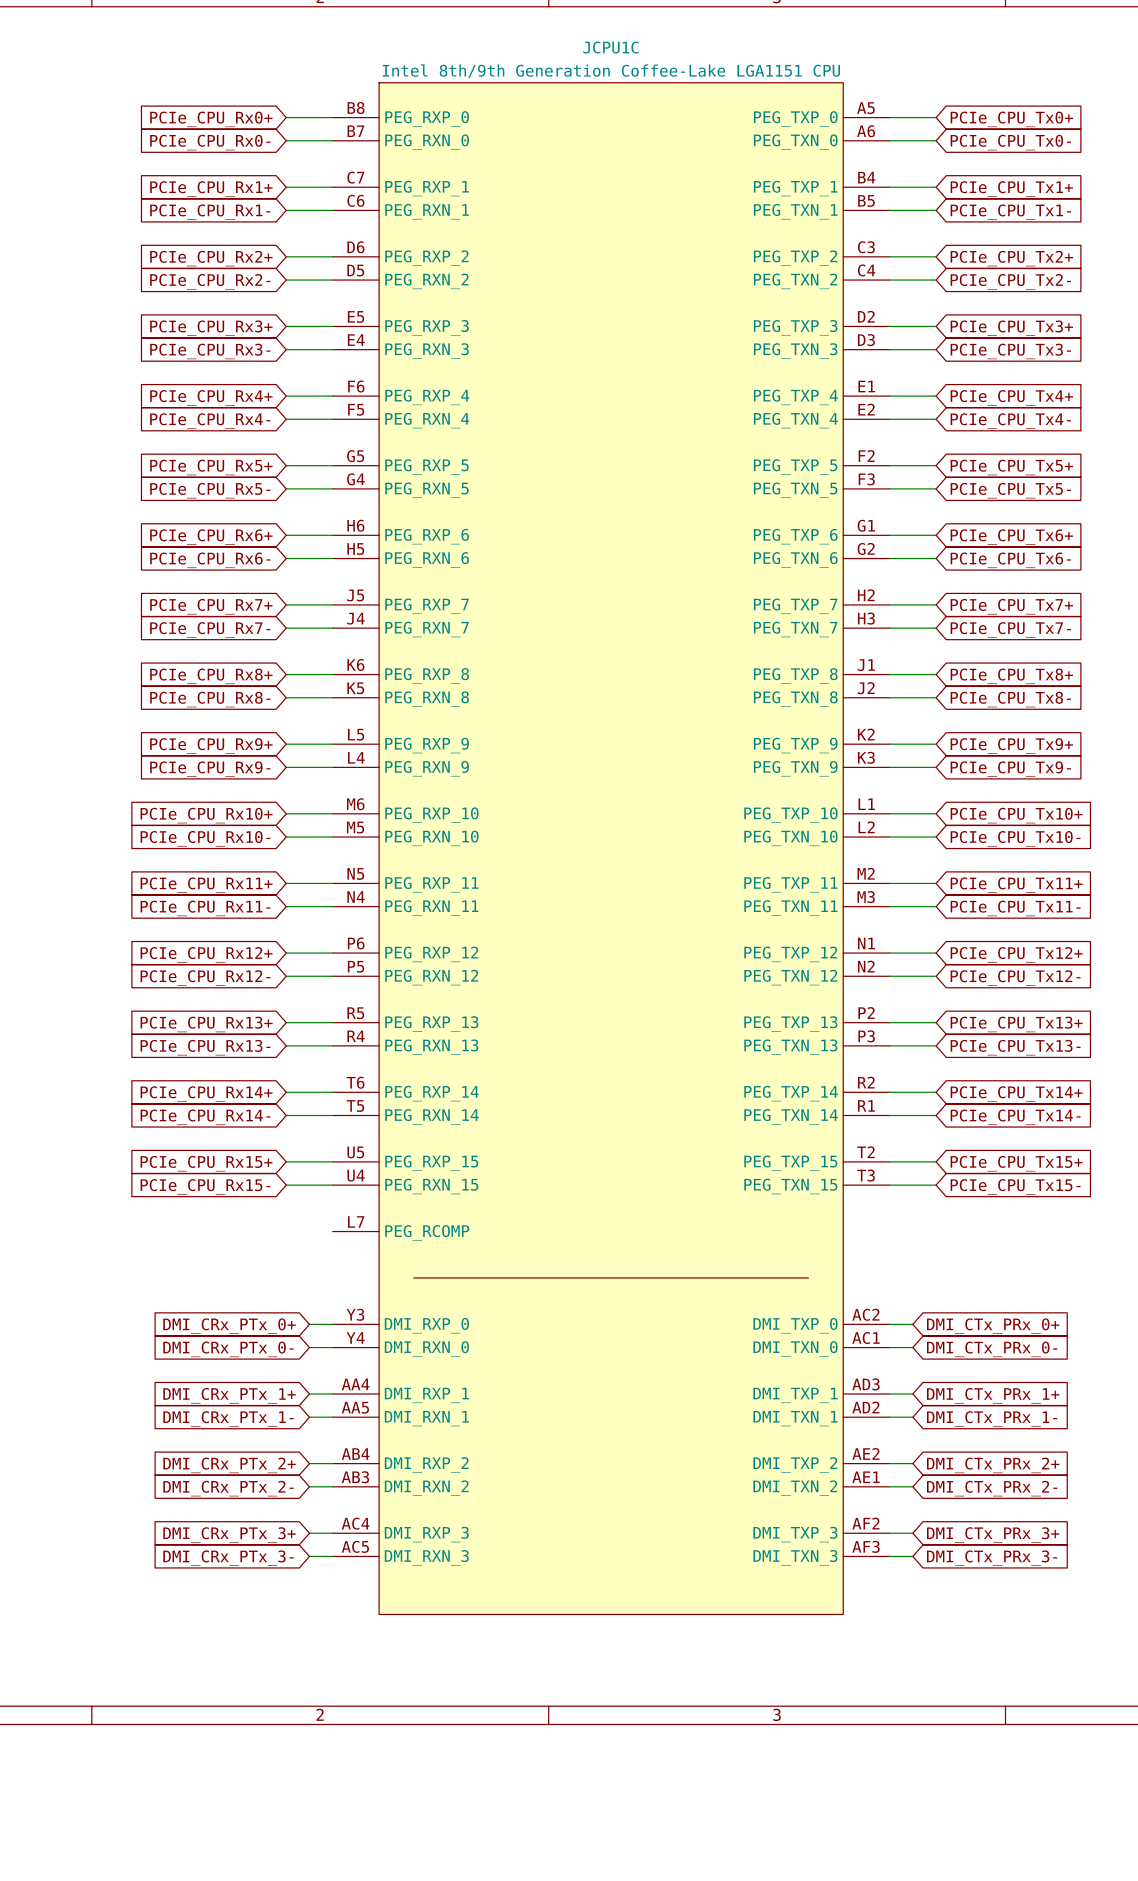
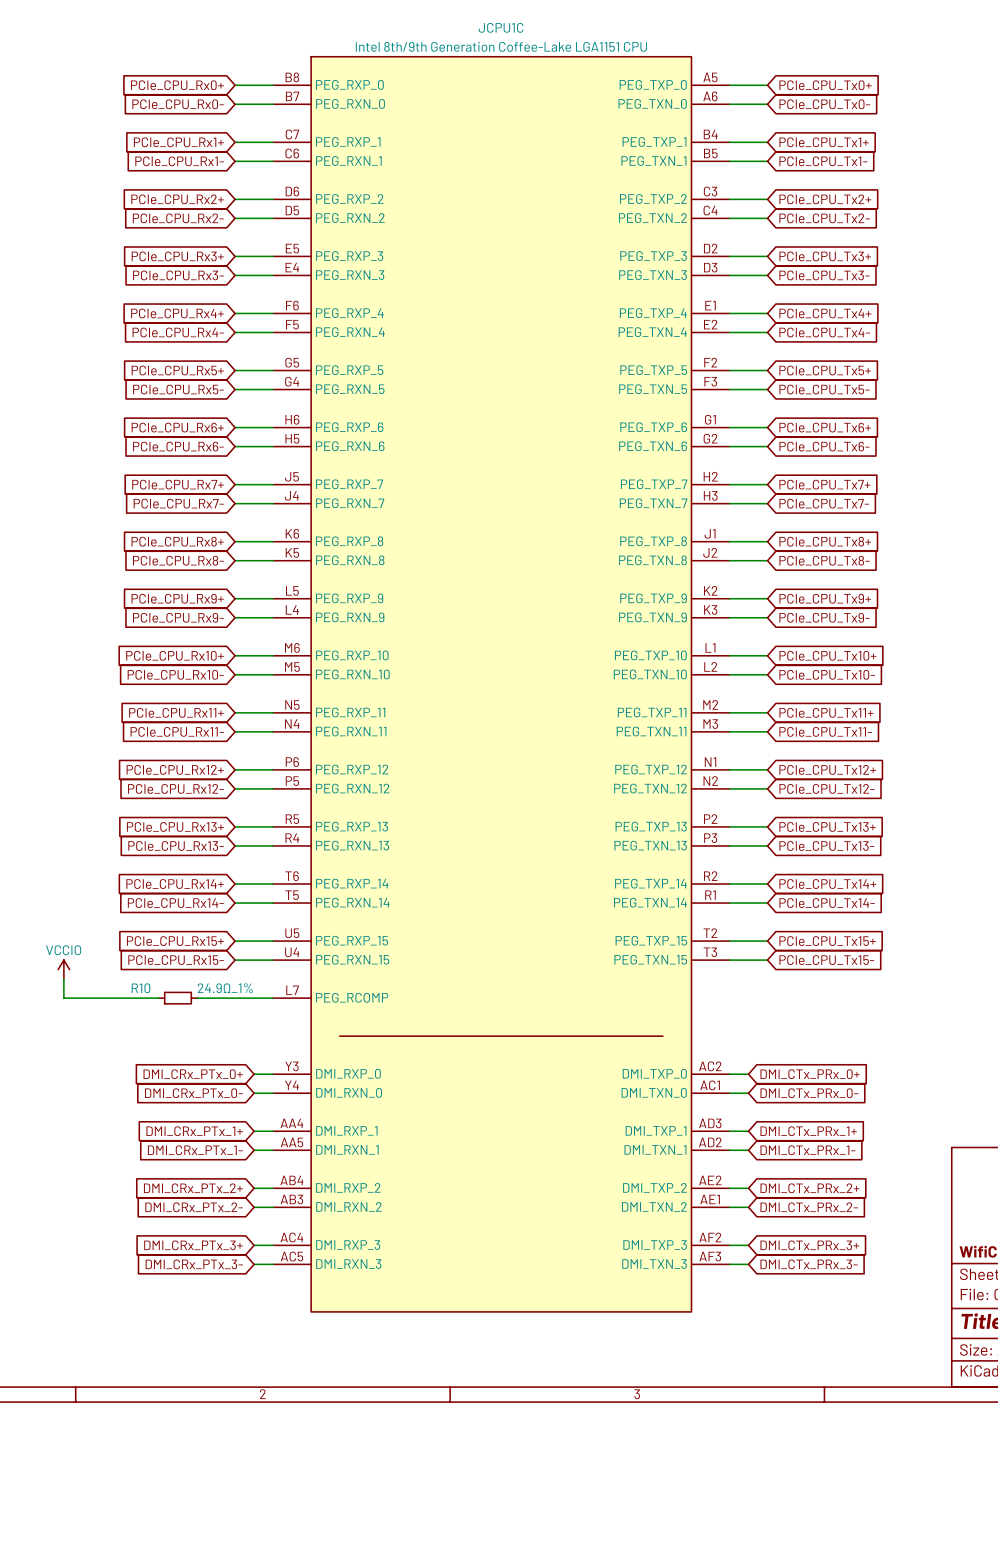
power symbol: none -> VCCIO (63, 969)
wire: none -> (63, 979) (63, 998) (158, 998)
R10: none -> 24.9Ω_1% (177, 998)
wire: none -> (197, 998) (273, 998)

